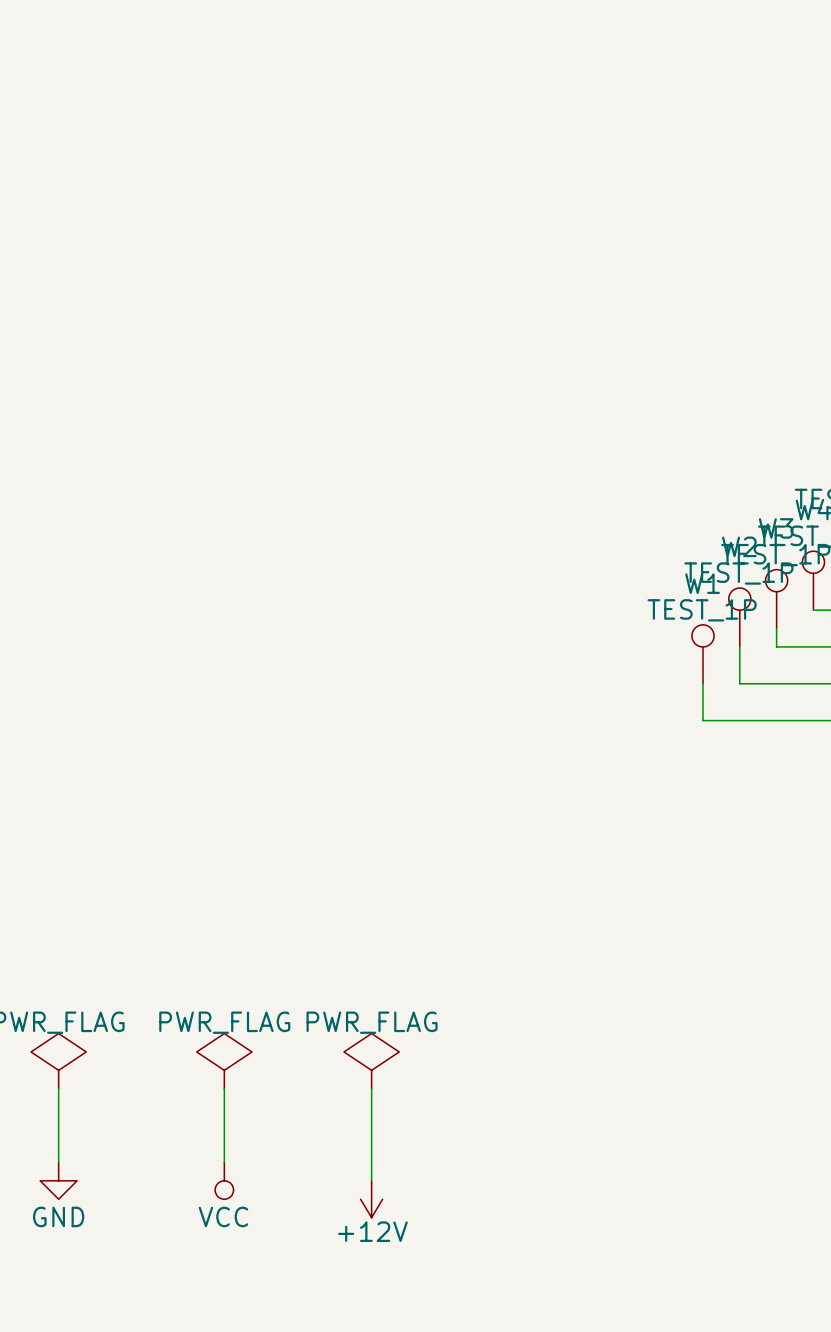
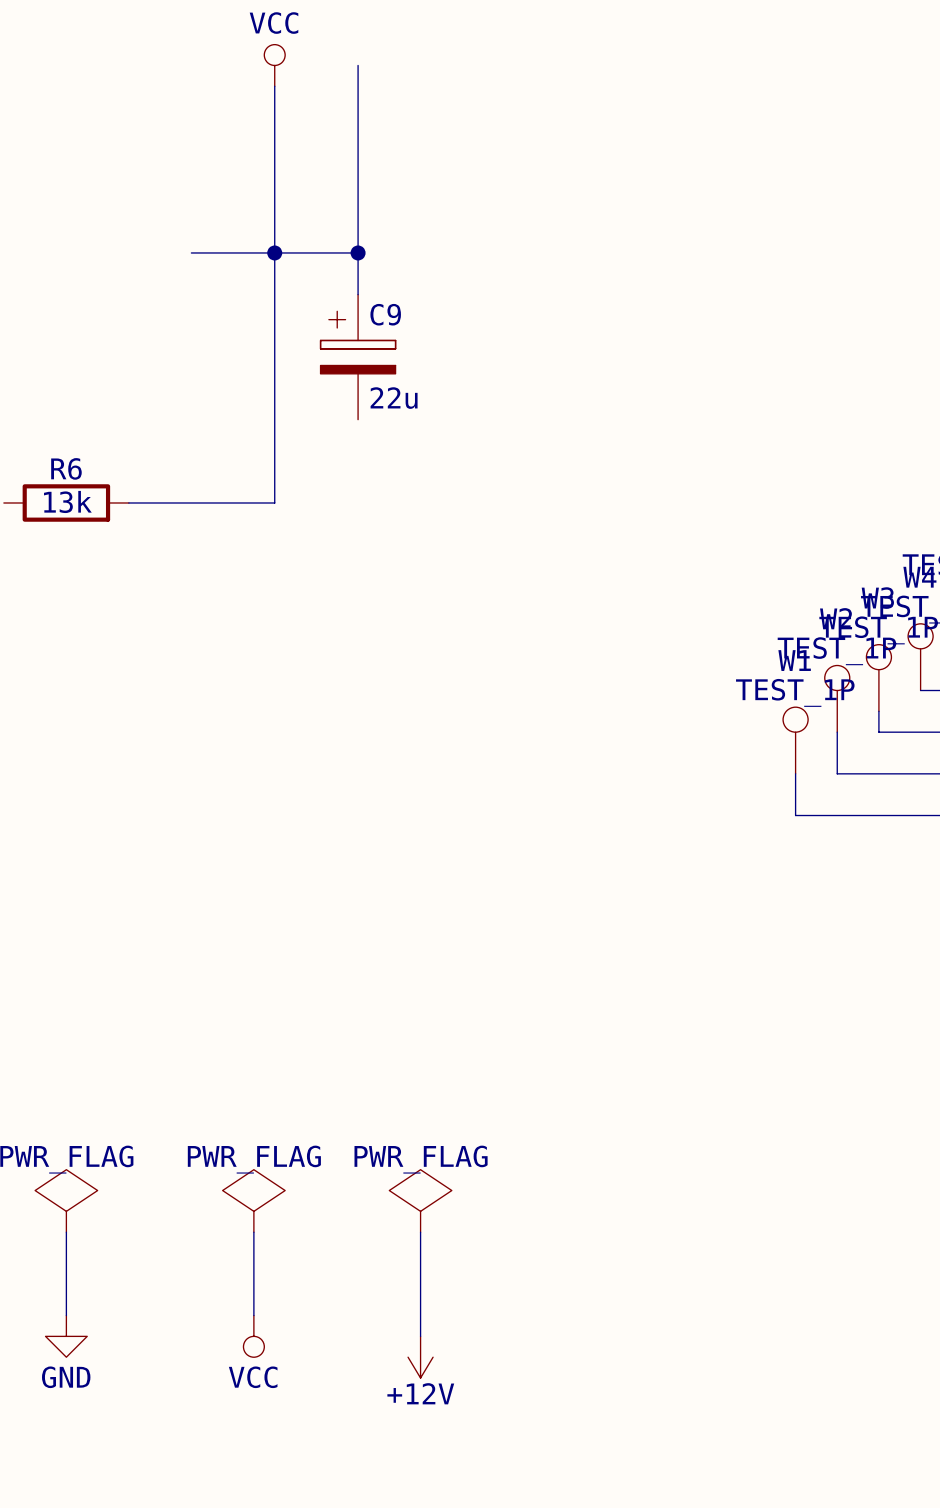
power symbol: none -> VCC (274, 65)
wire: none -> (358, 65) (358, 294)
wire: none -> (274, 86) (274, 502) (128, 502)
wire: none -> (191, 252) (358, 252)
junction: none -> (274, 252)
junction: none -> (358, 252)
C9: none -> 22u (358, 357)
R6: none -> 13k (66, 502)

